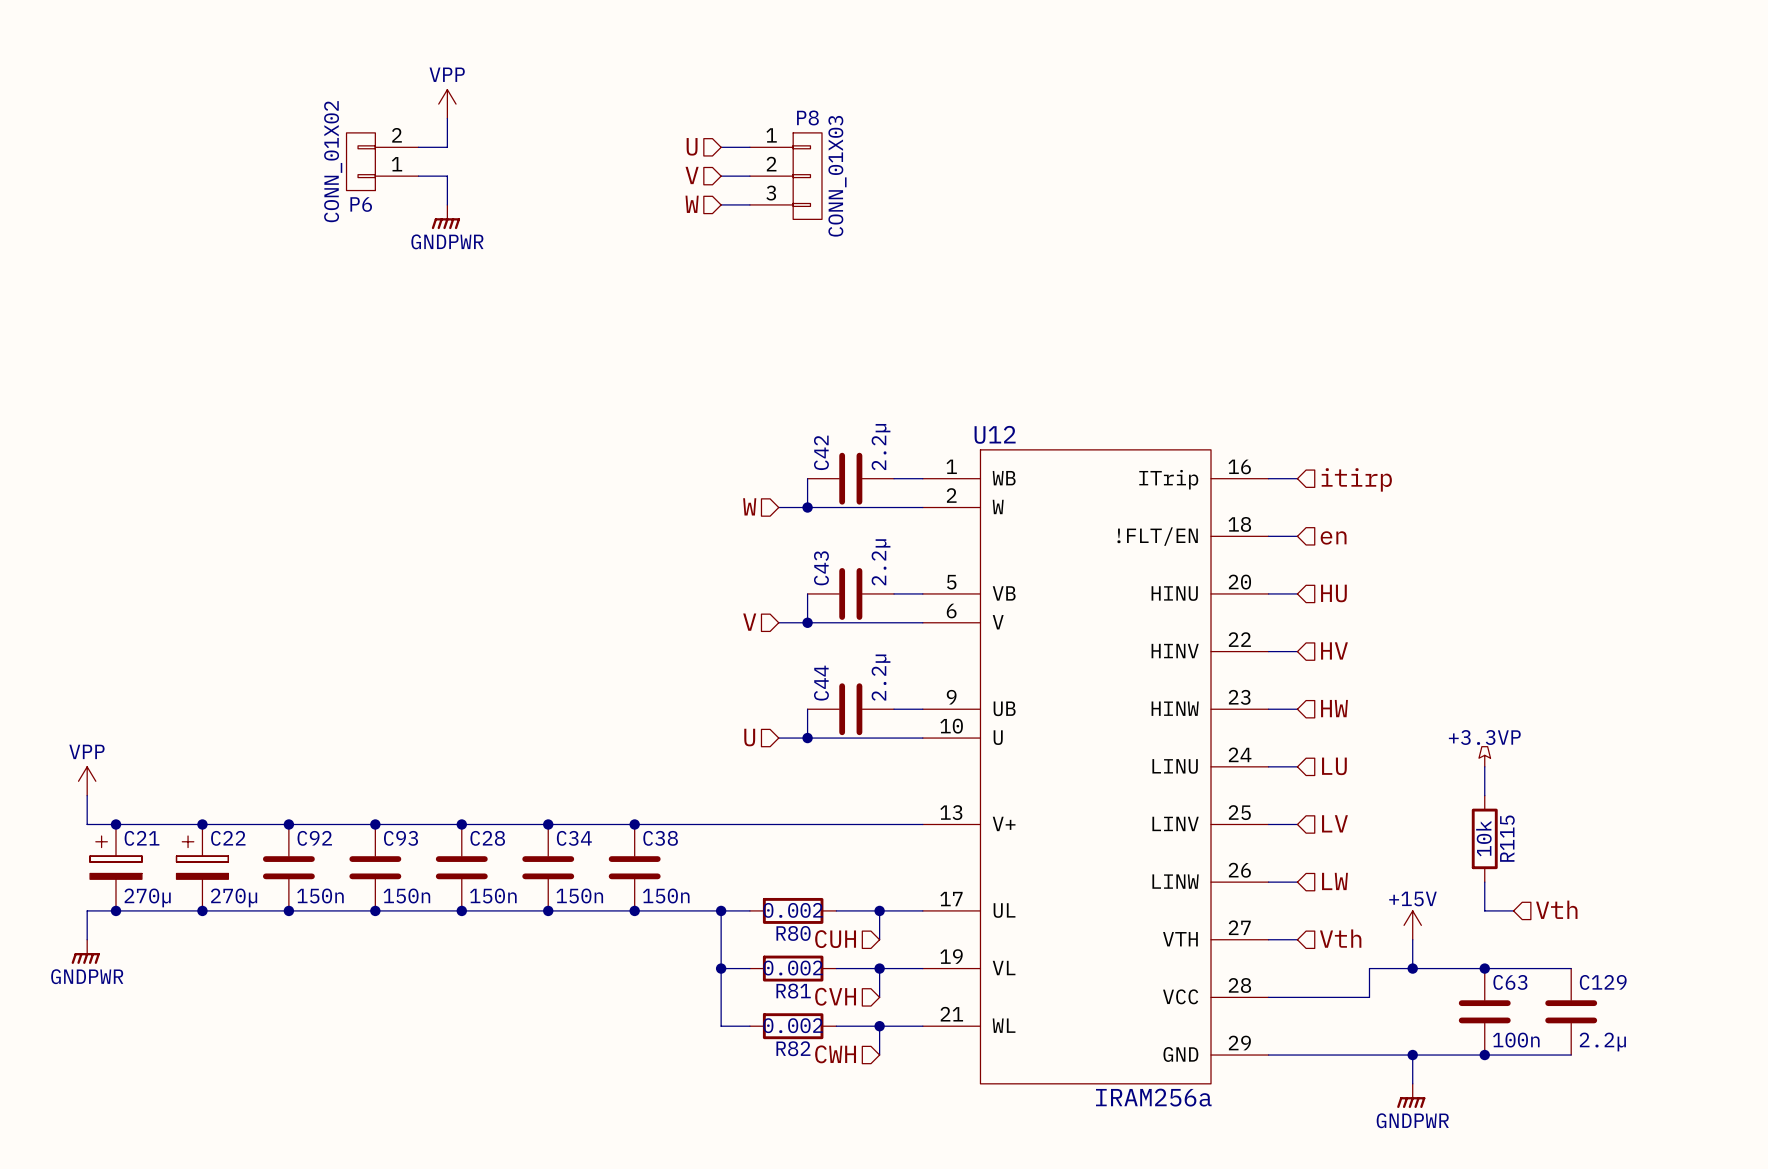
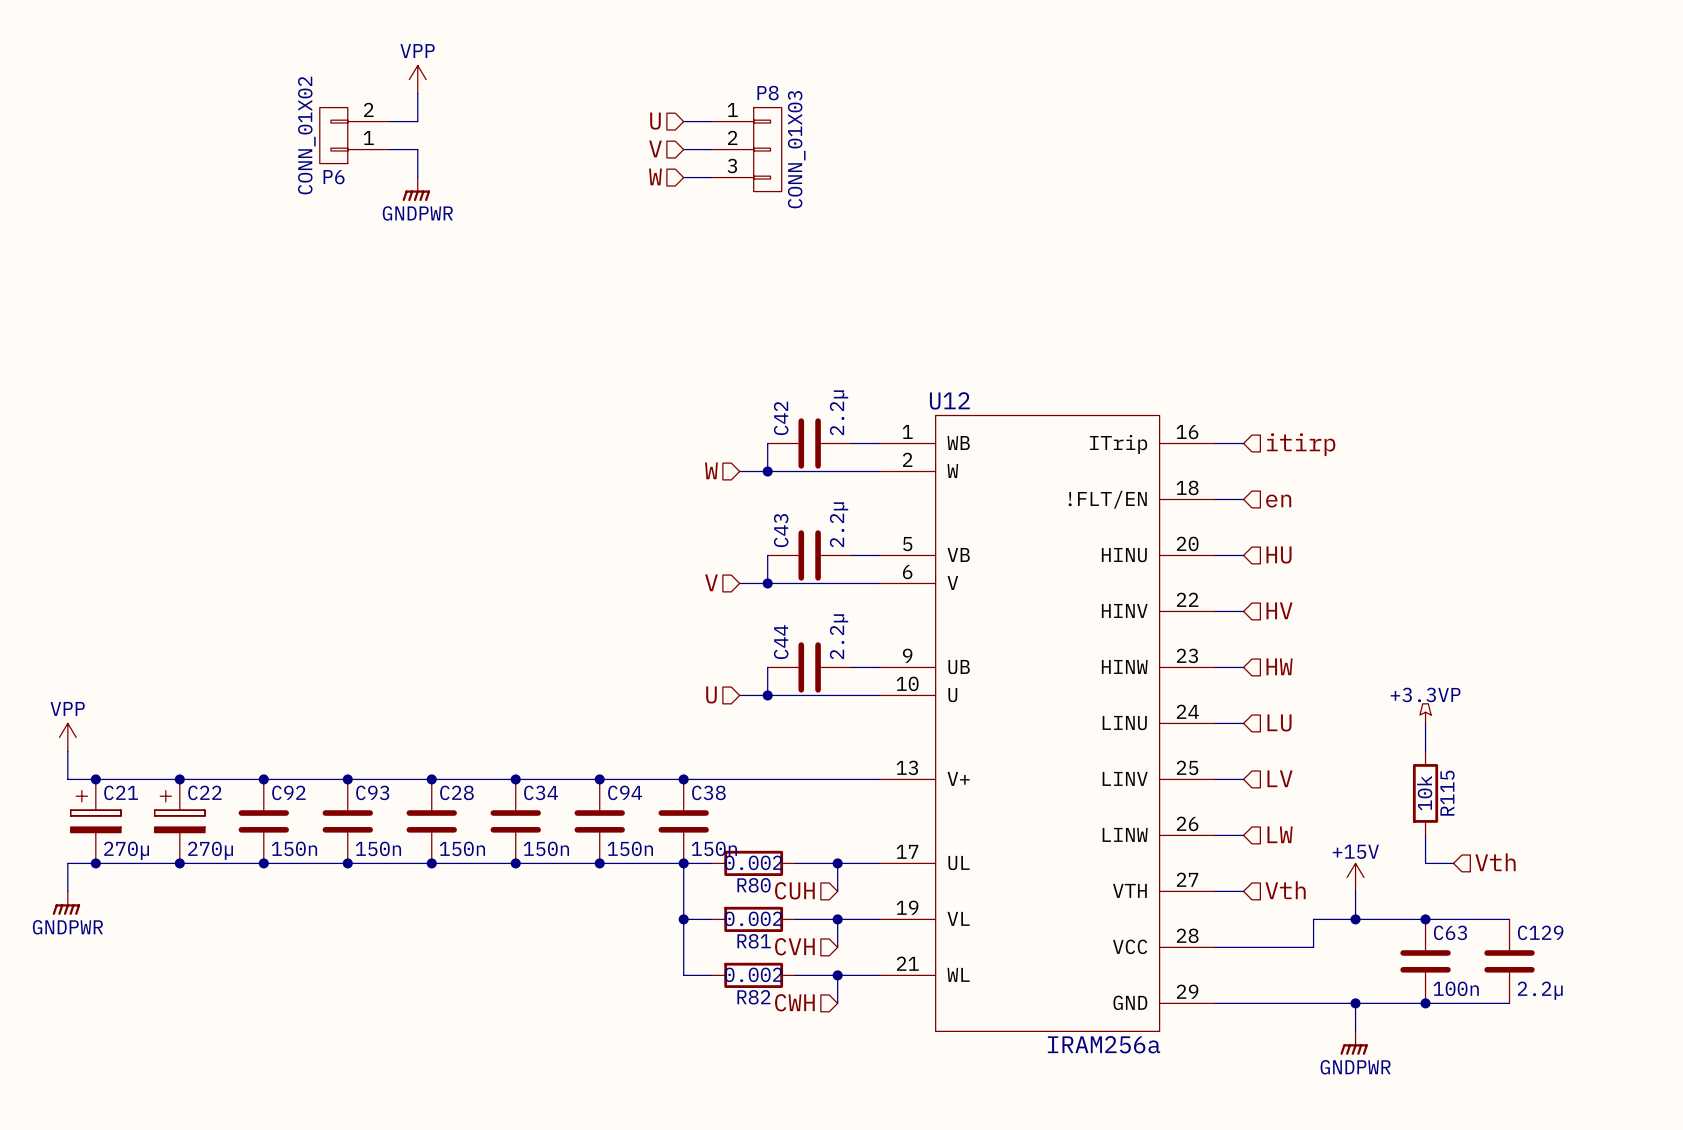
junction: none -> (683, 779)
C38 name: C38 (660, 838) -> C94 (625, 792)
C38: none -> 150n (683, 821)

